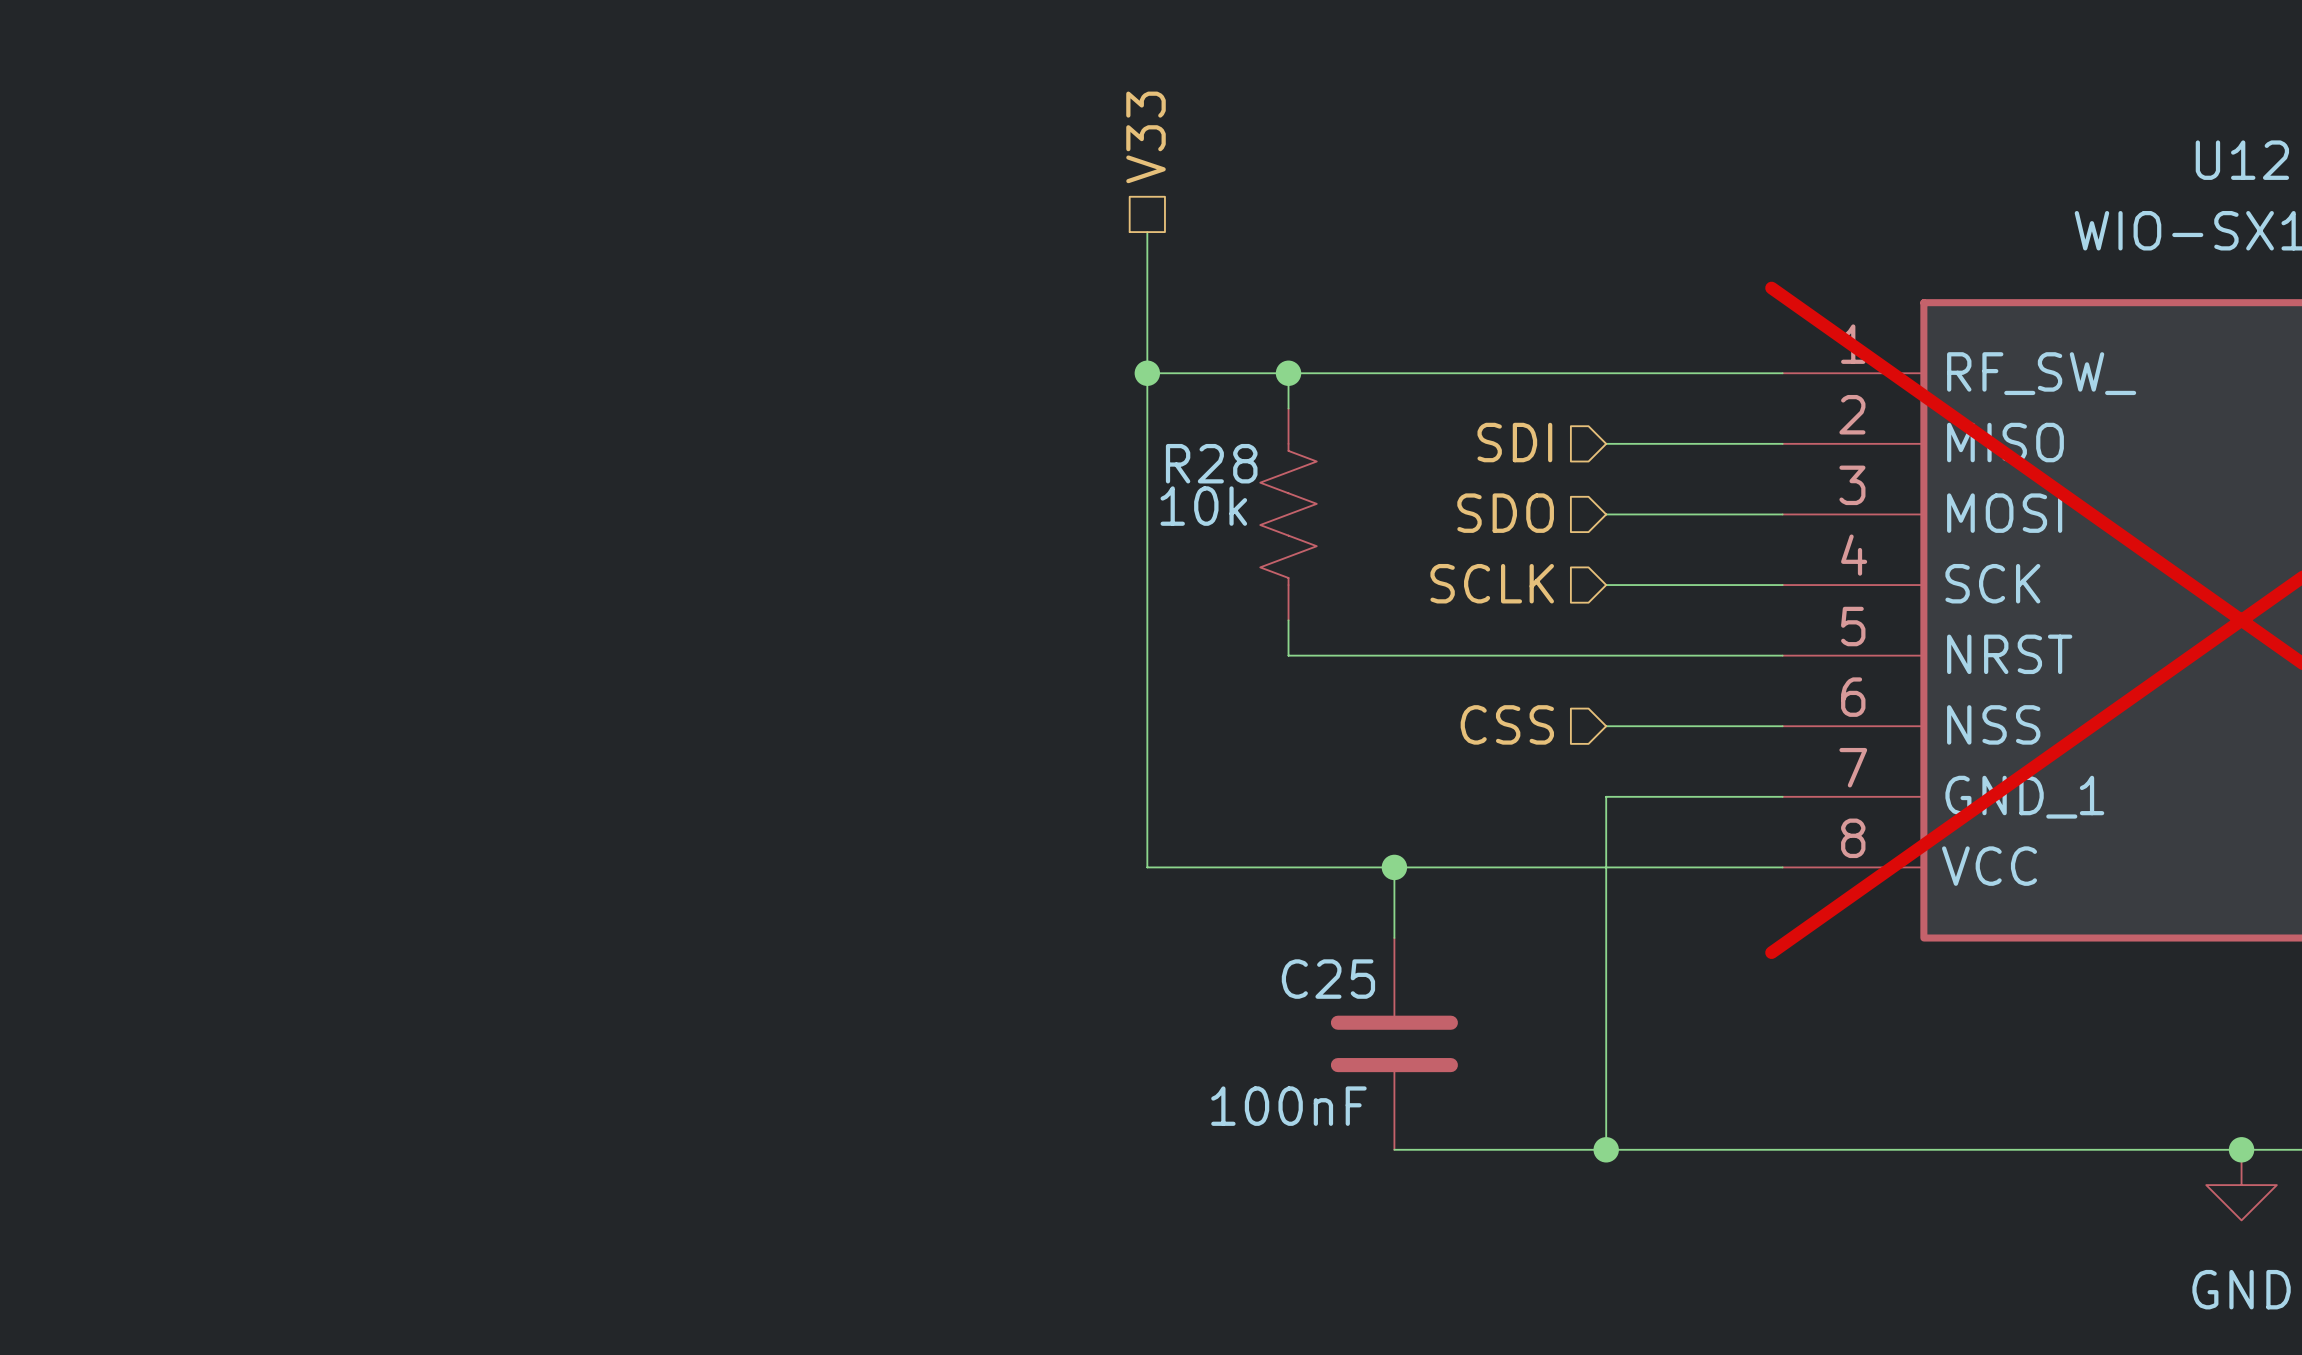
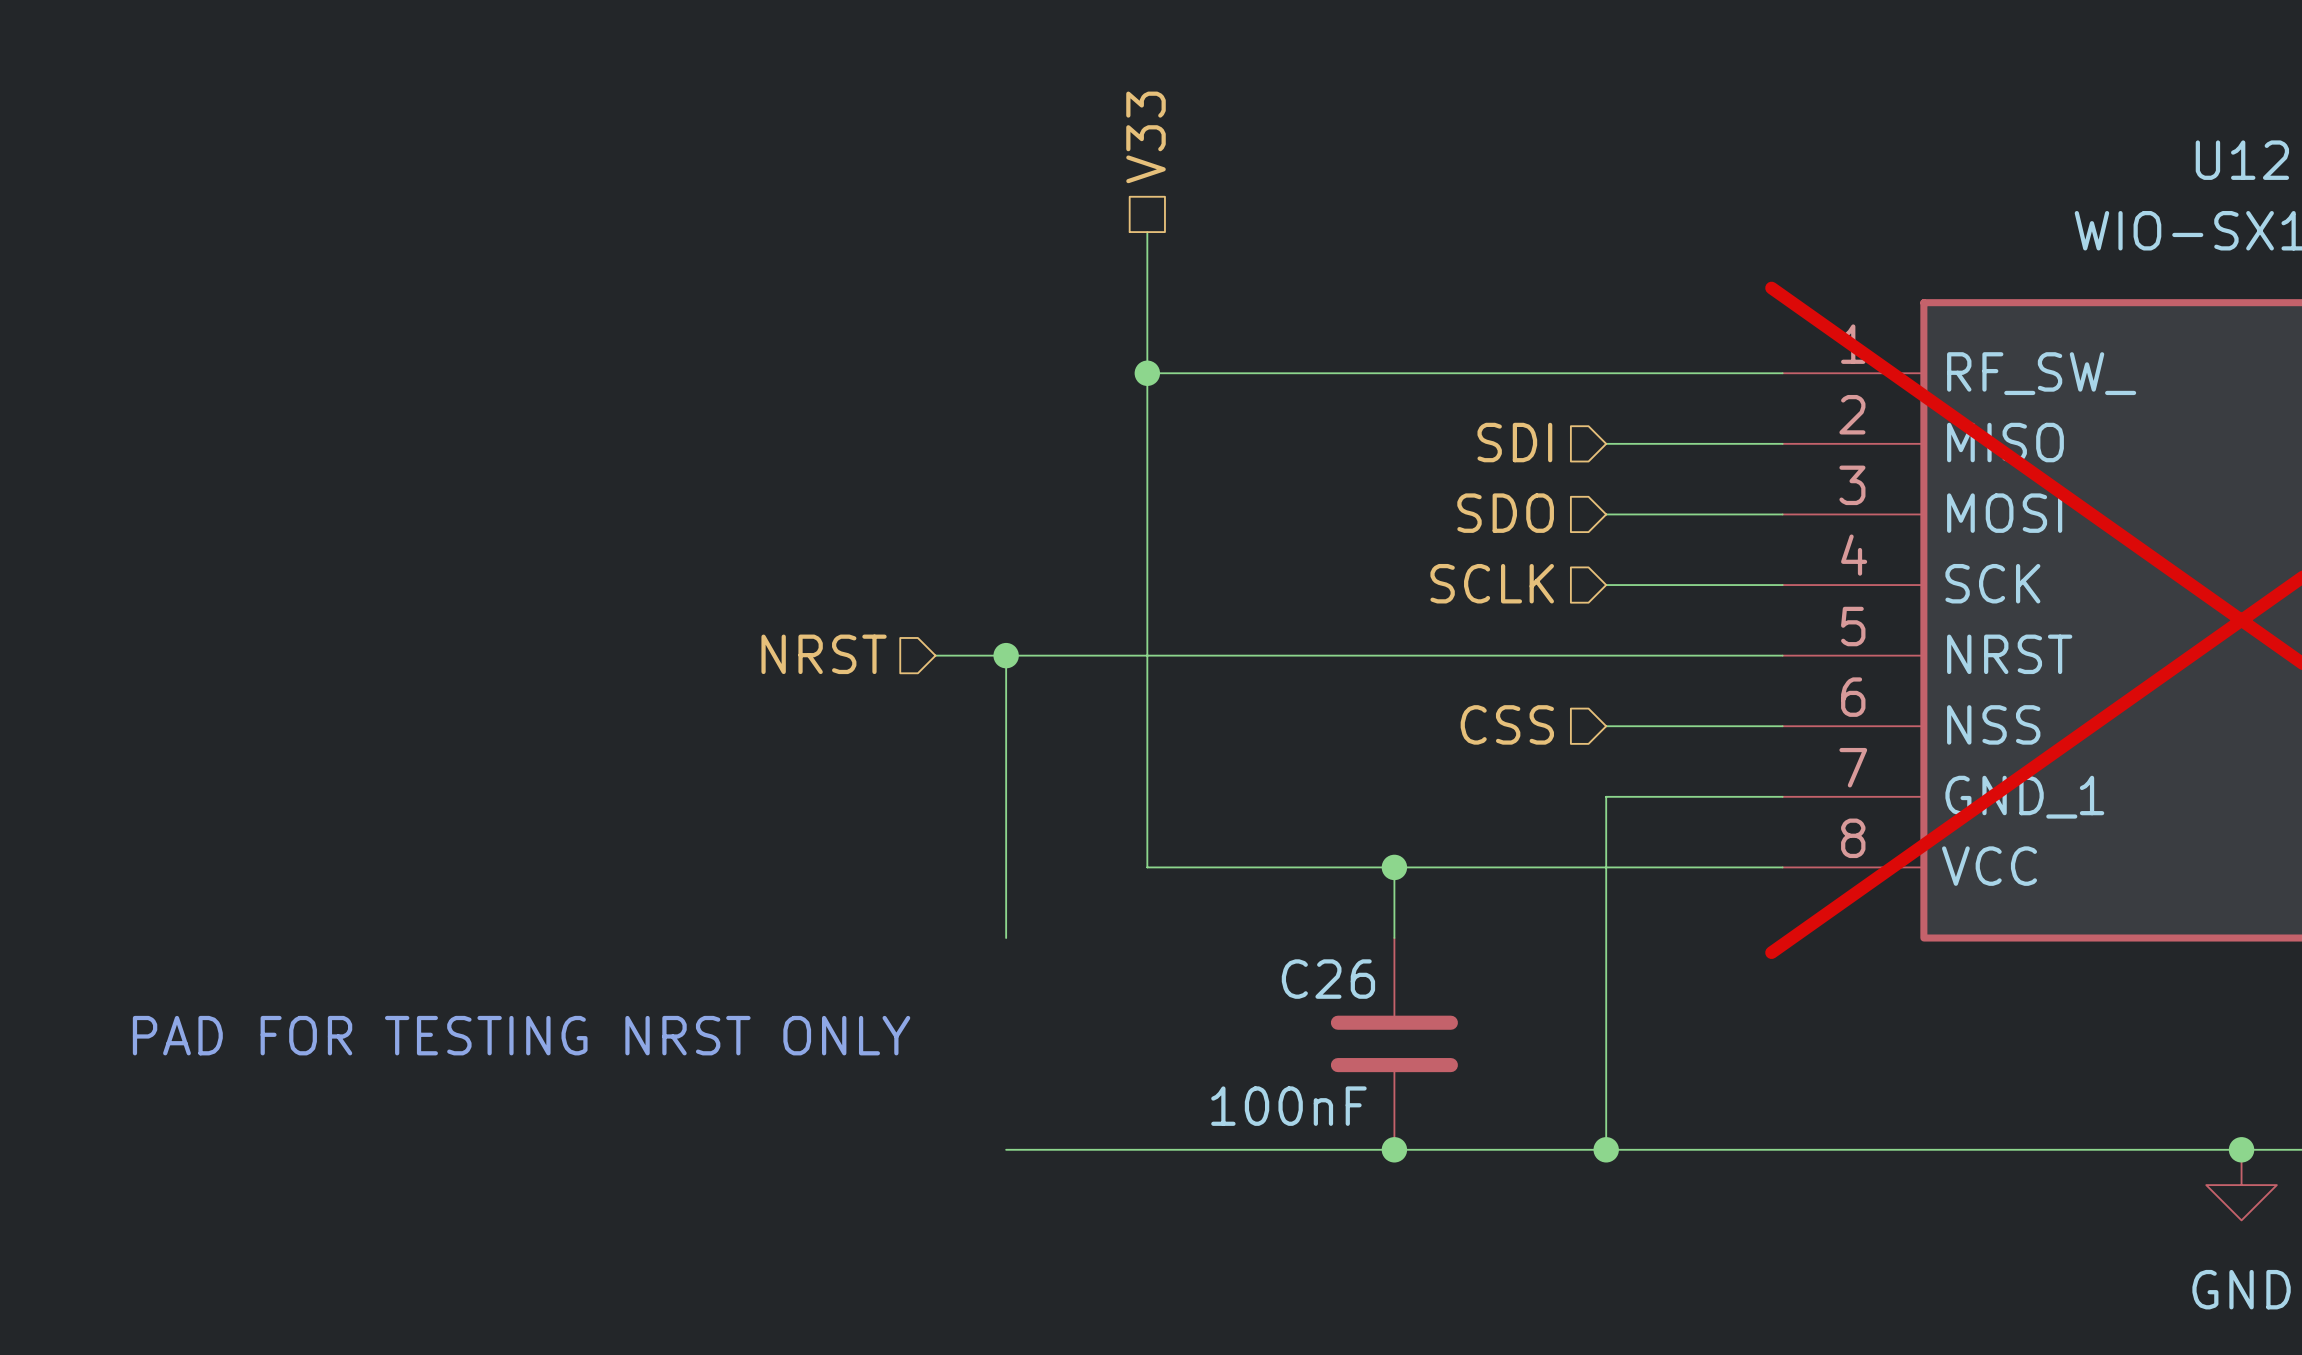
wire: (1288, 373) (1288, 408) -> none
junction: (1288, 373) -> none
R28: 10k (1288, 514) -> none
wire: (1288, 620) (1288, 655) -> (935, 655) (1288, 655)
hierarchical label: none -> NRST (824, 654)
wire: none -> (1006, 655) (1006, 938)
junction: none -> (1006, 655)
C25 name: C25 (1328, 979) -> C26 (1328, 979)
text: none -> PAD FOR TESTING NRST ONLY (521, 1035)
wire: none -> (1006, 1149) (1394, 1149)
junction: none -> (1394, 1149)

